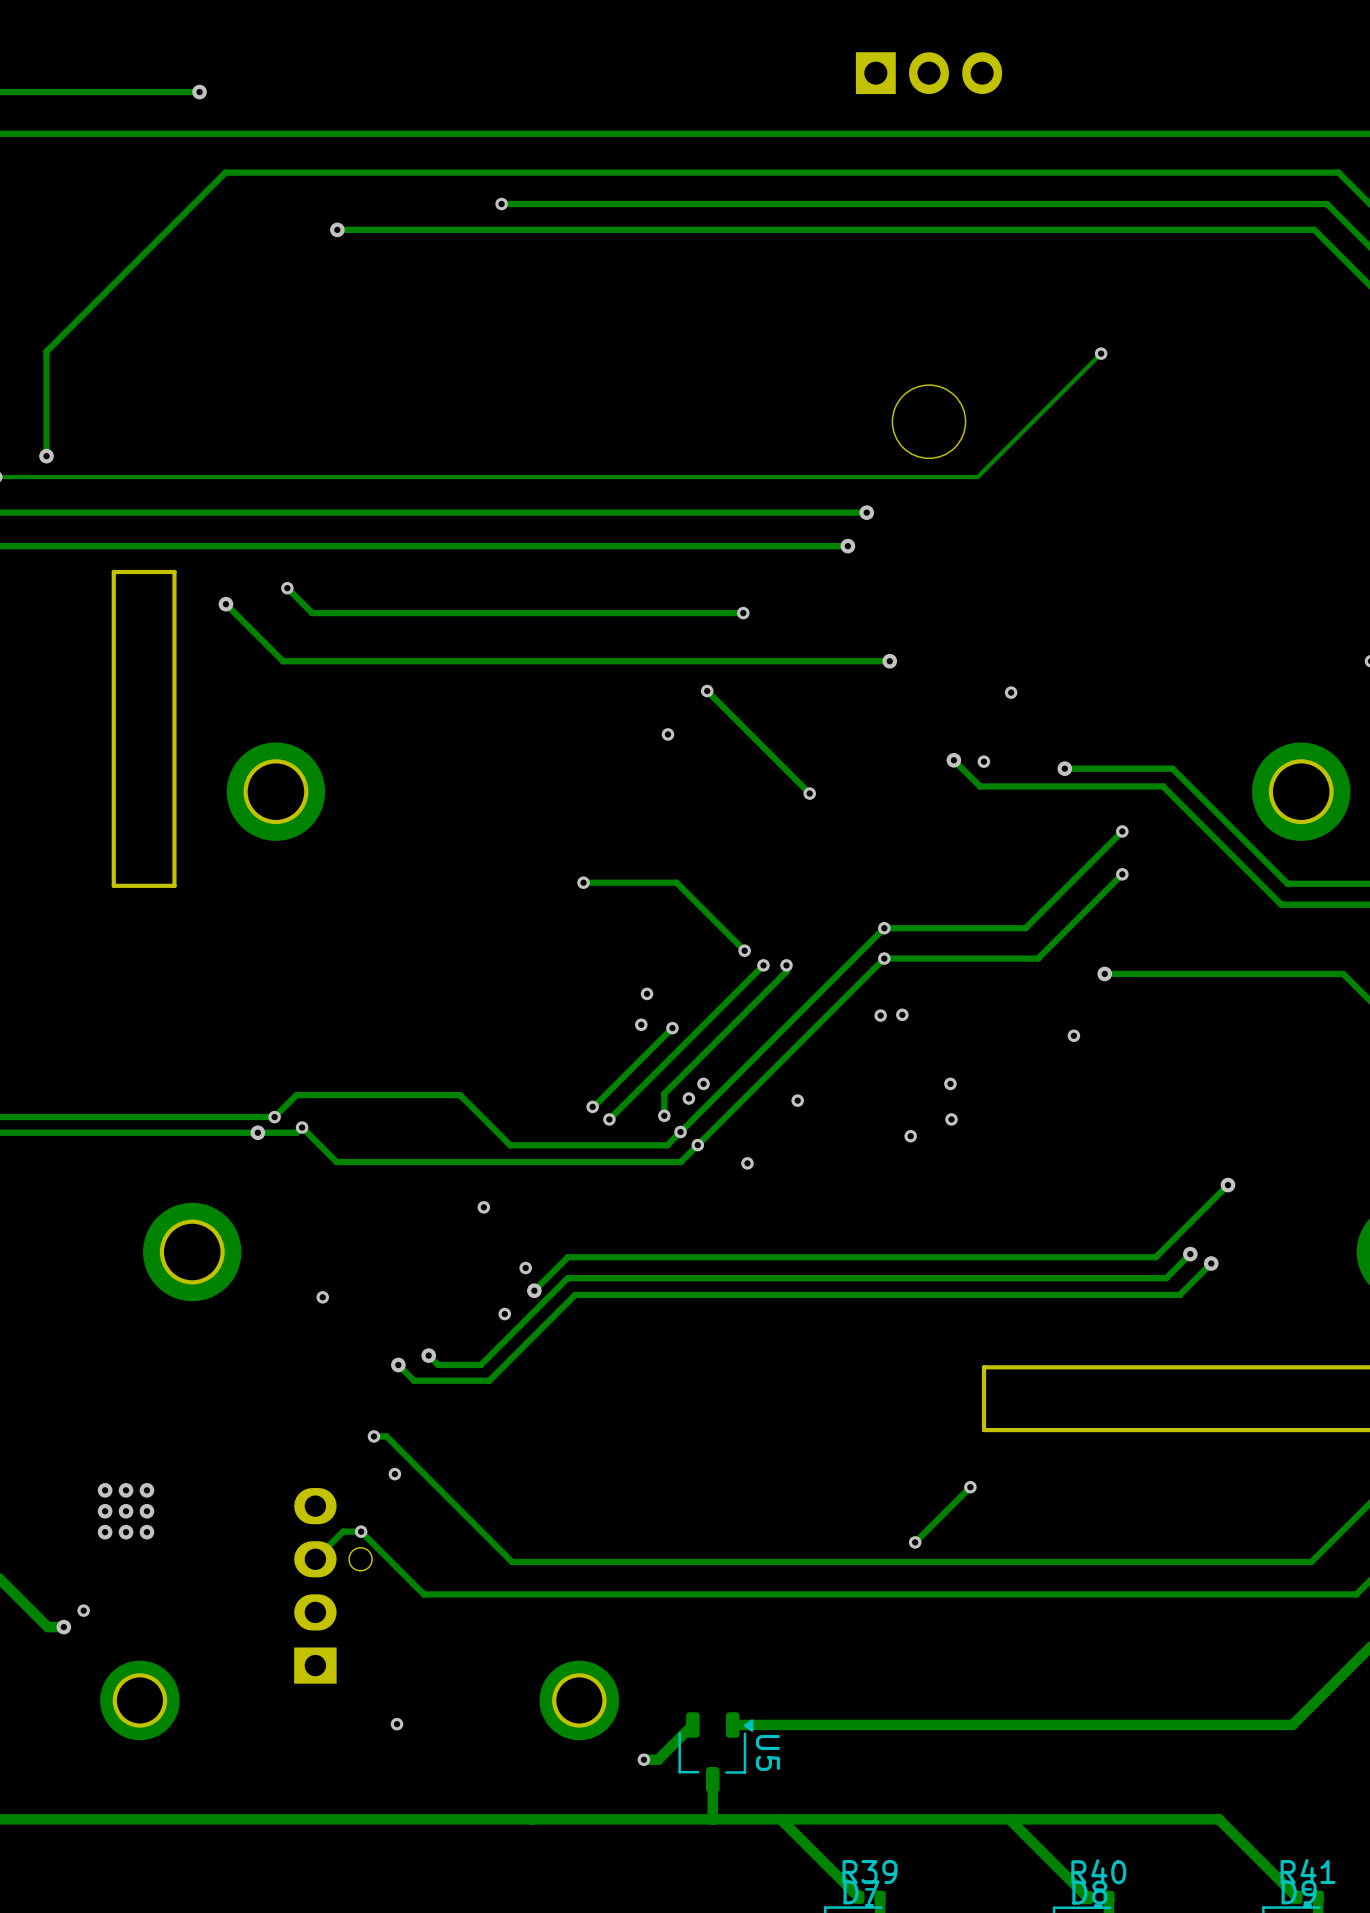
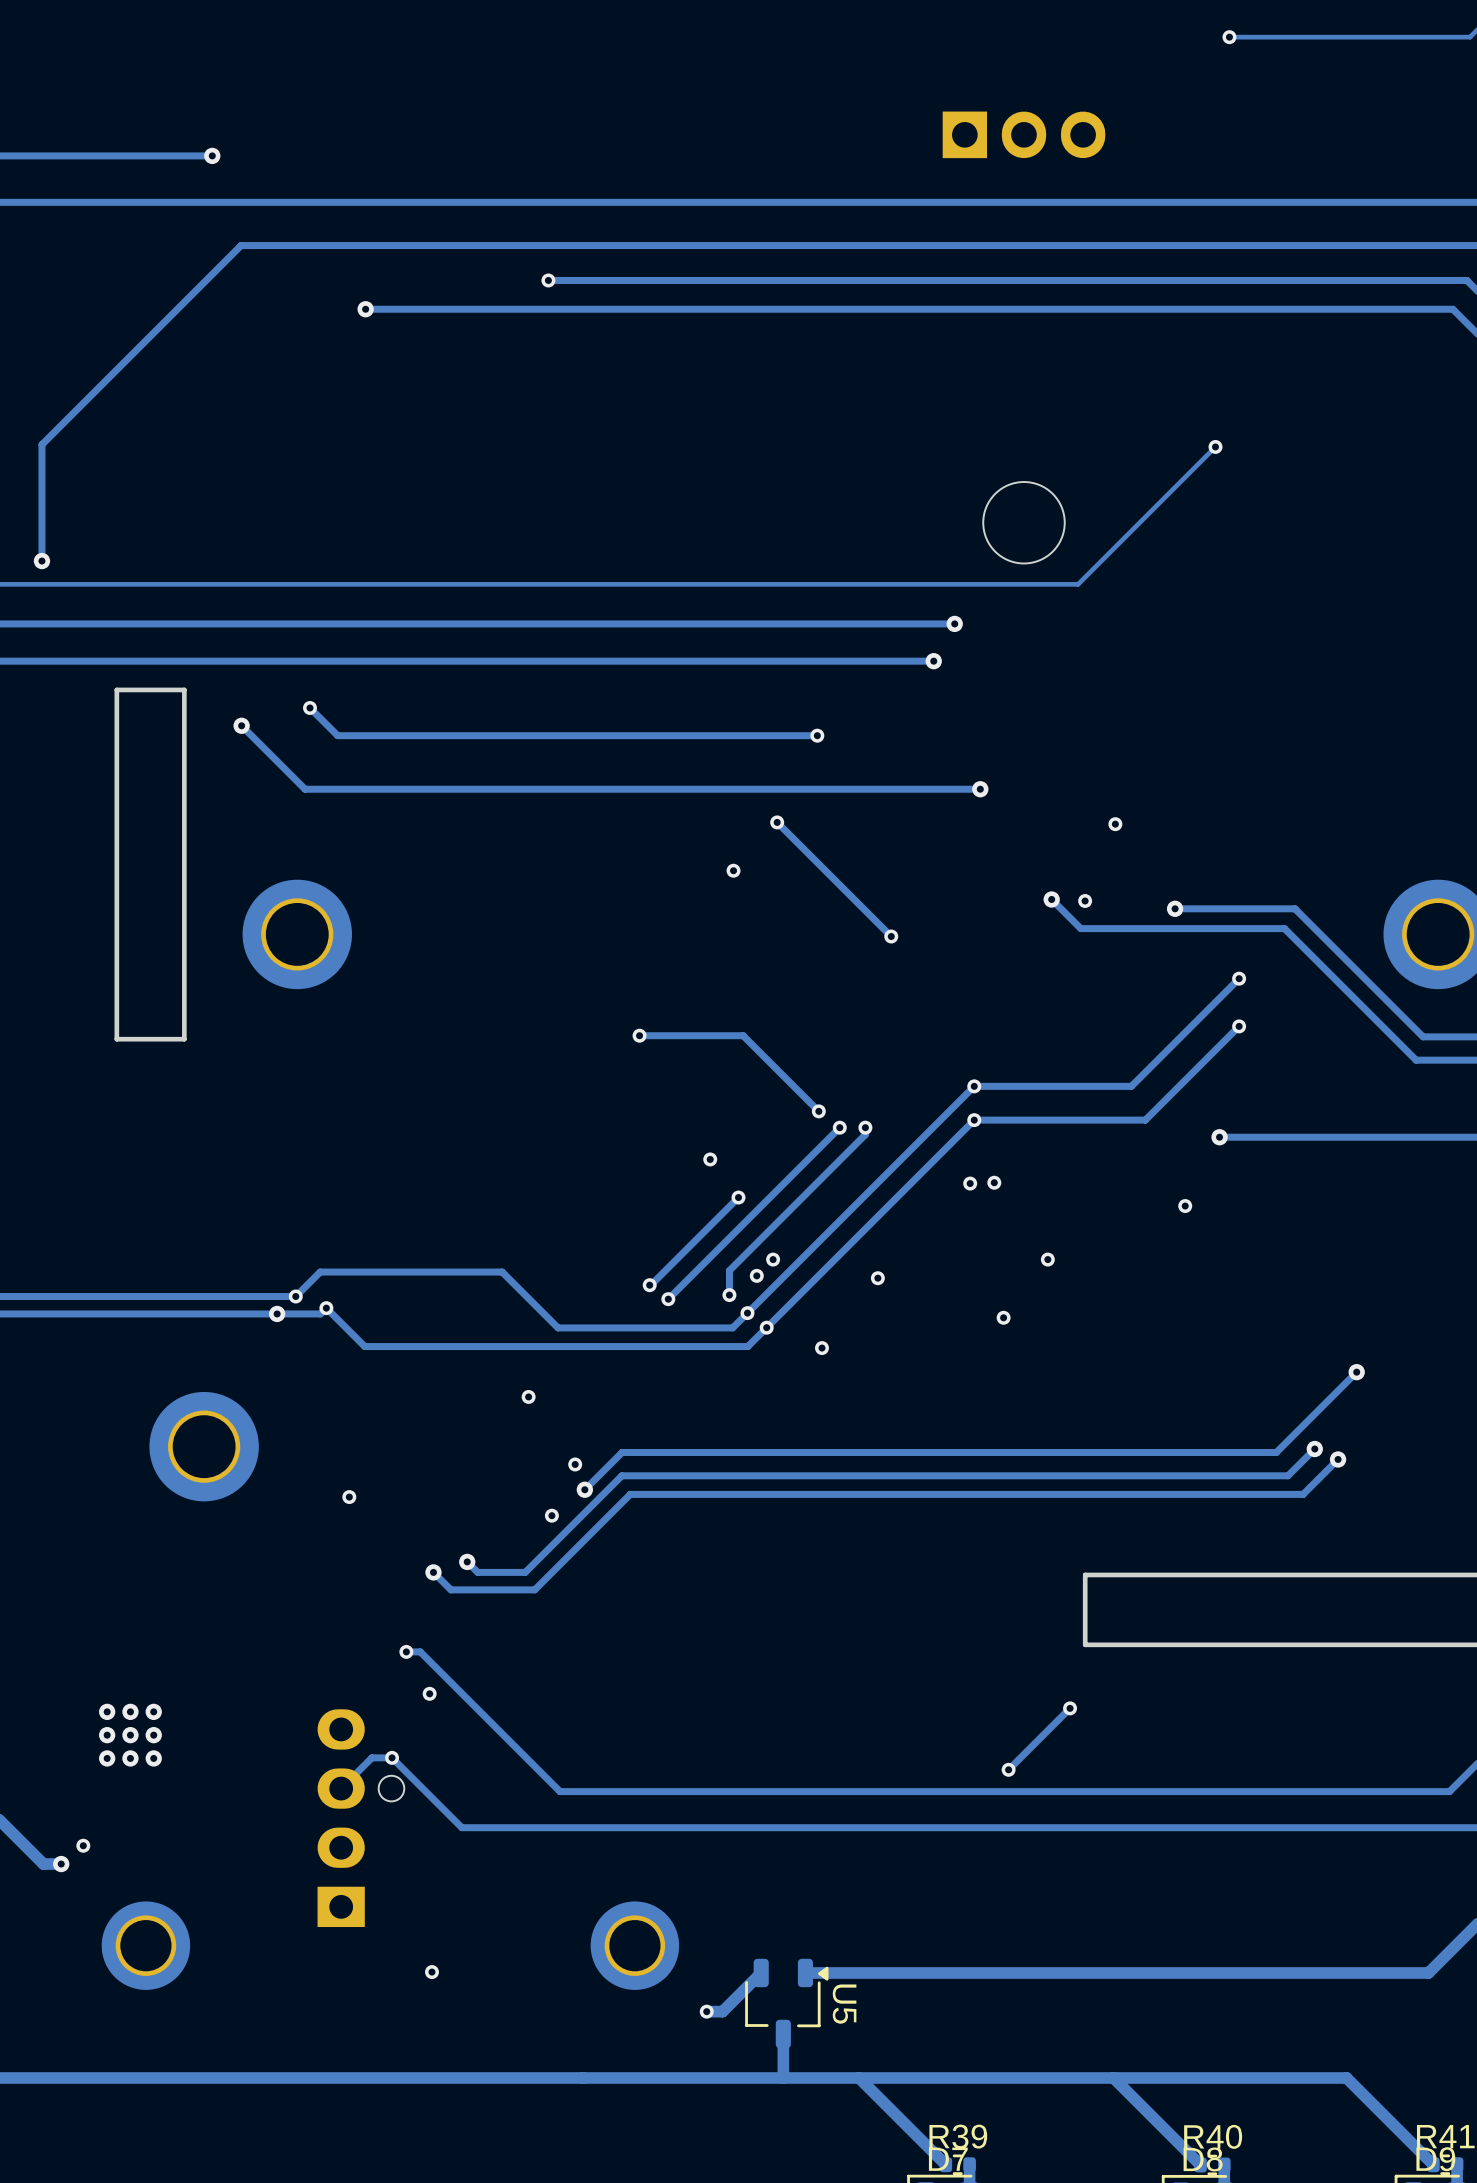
via: (641, 1024) -> none
via: (951, 1119) -> none

